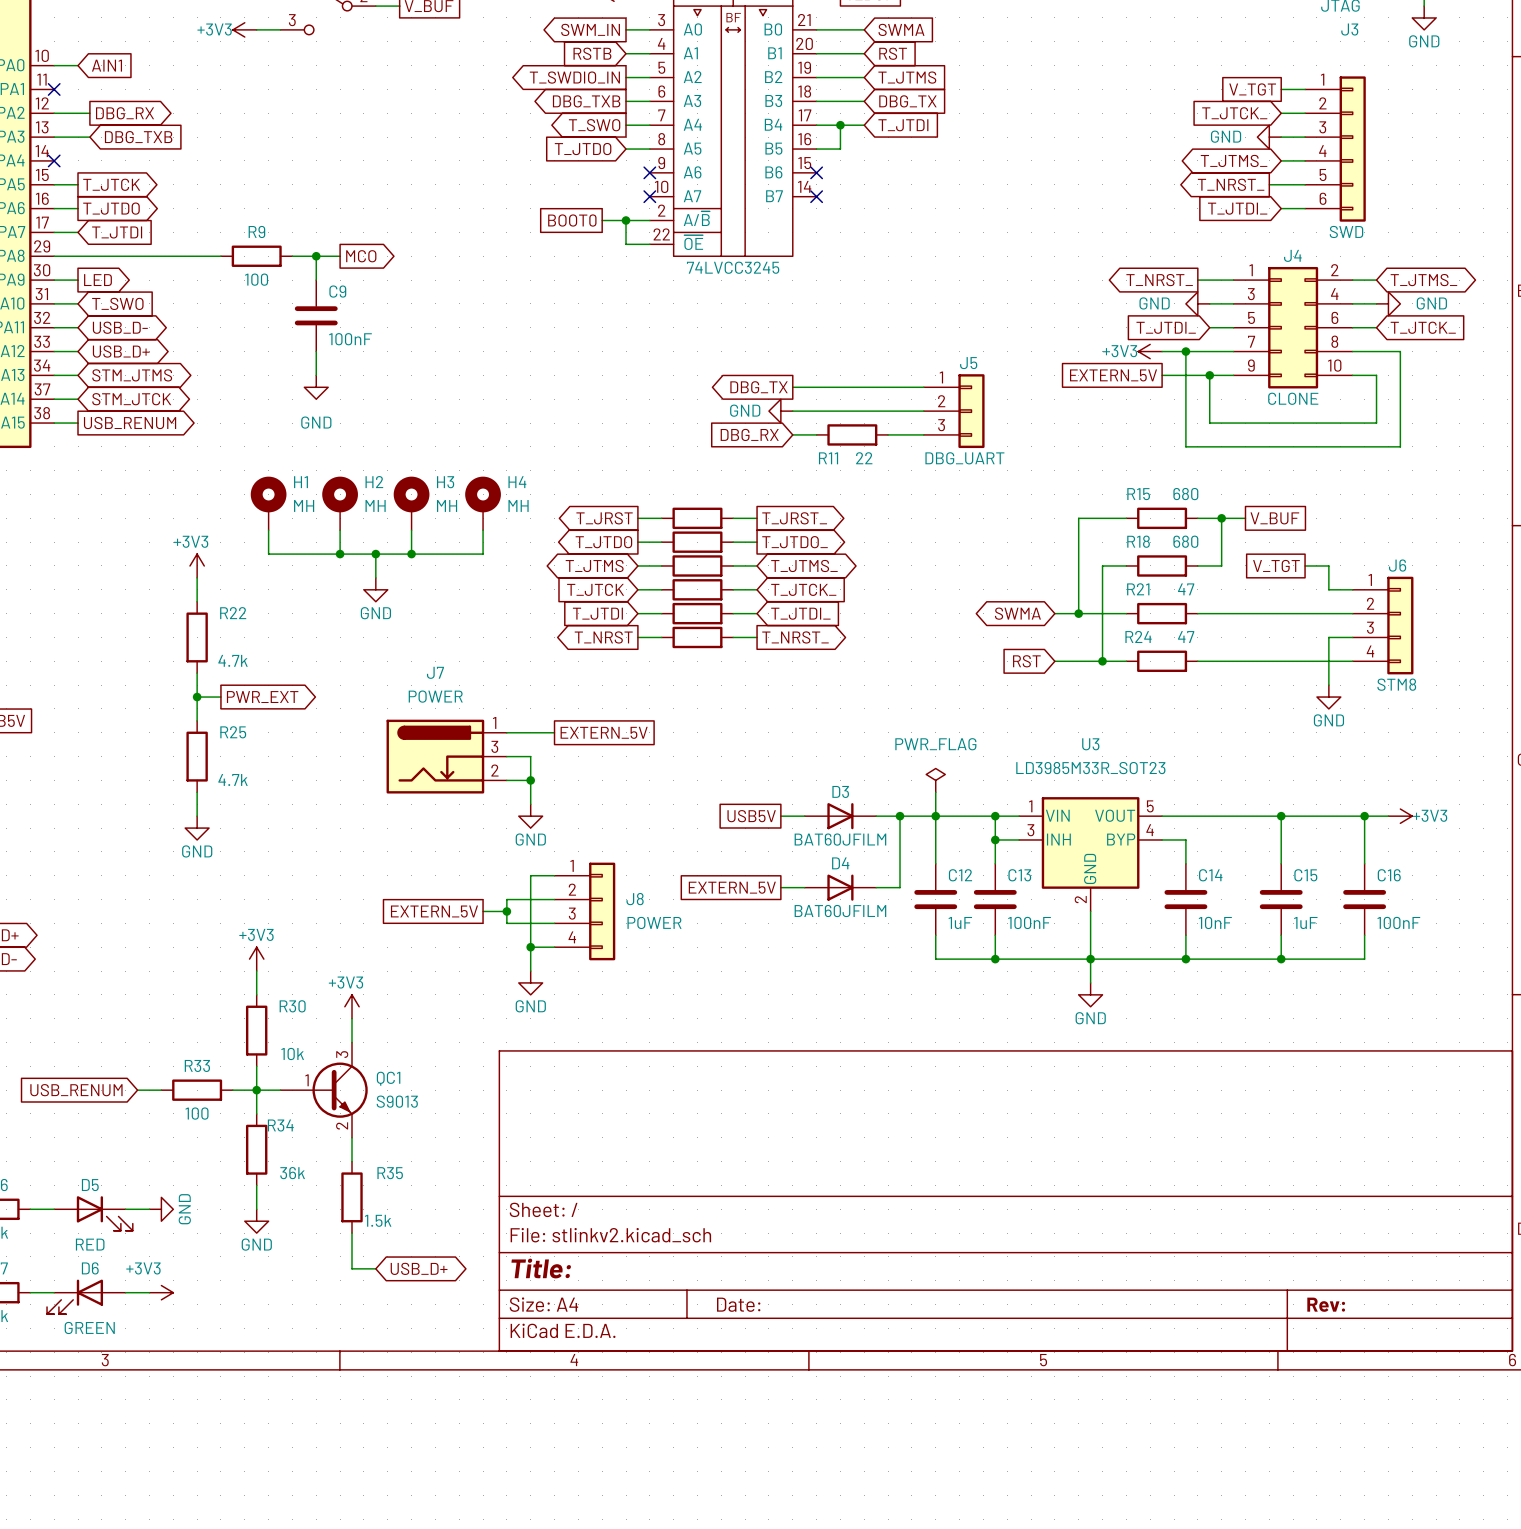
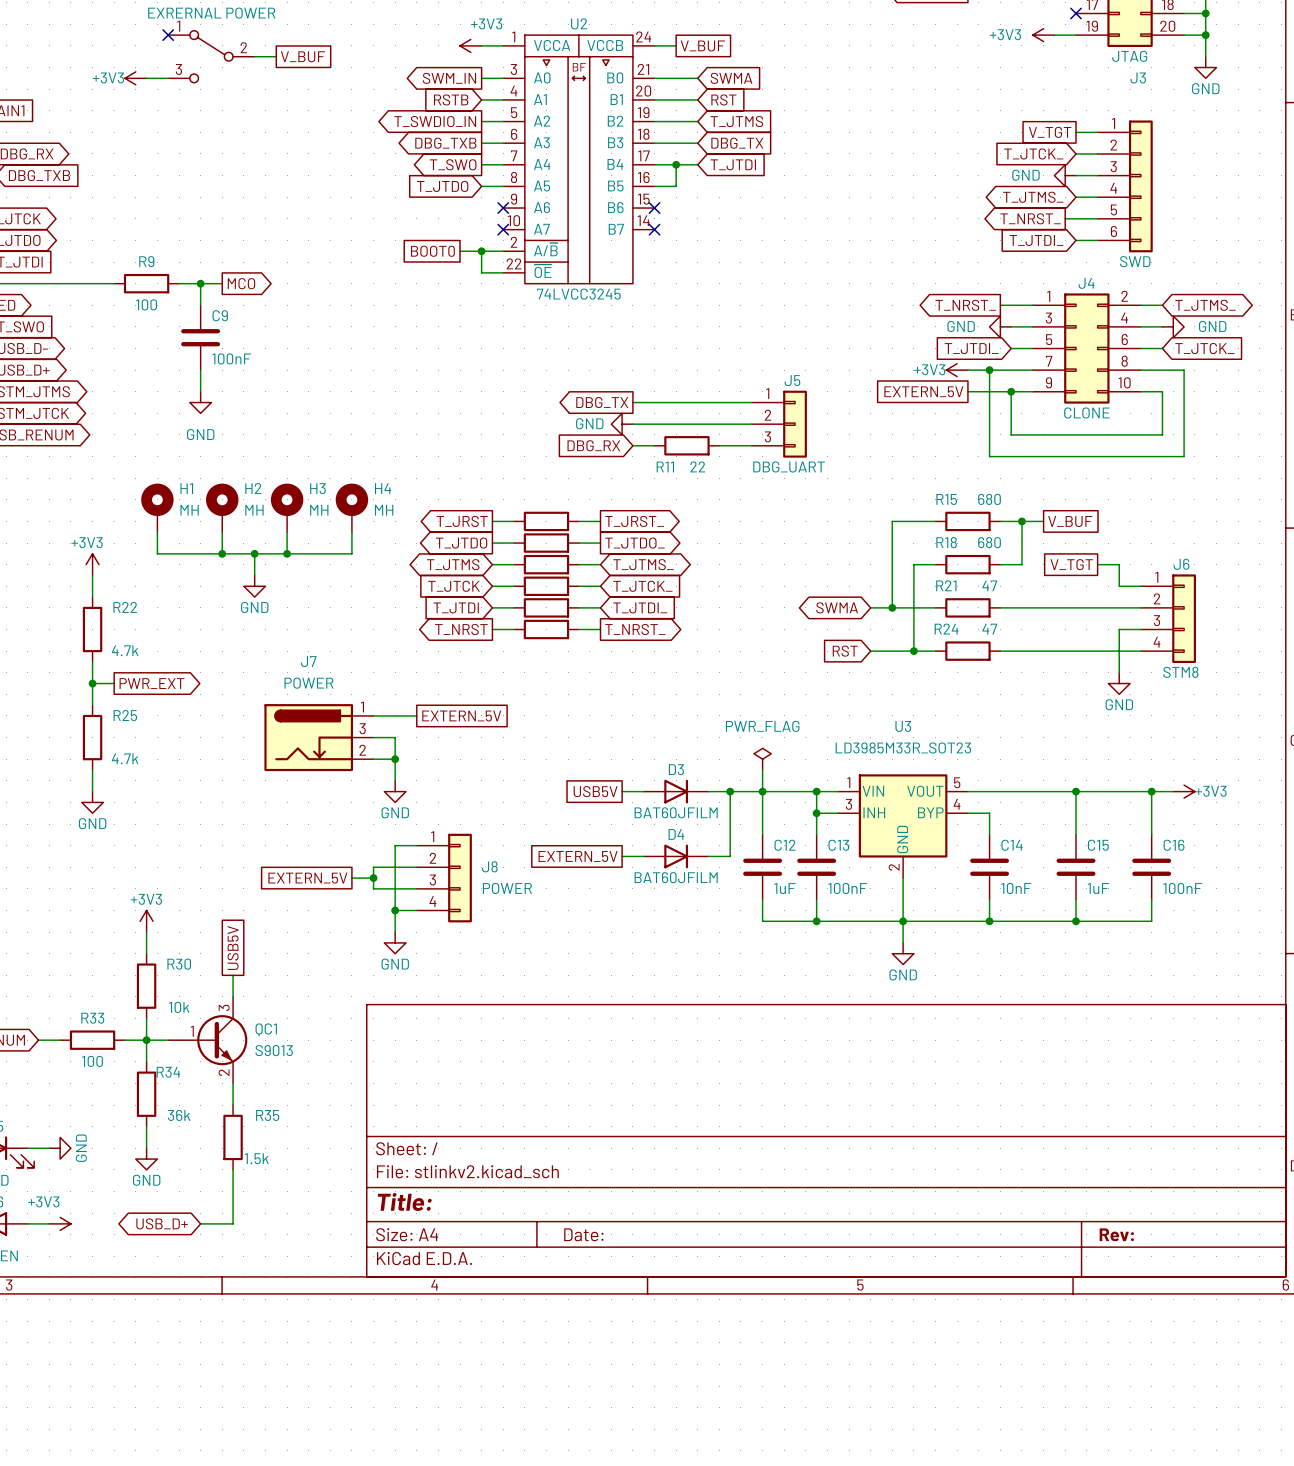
global label: none -> USB5V (233, 948)
power symbol: +3V3 (352, 1006) -> none
wire: (352, 1268) (375, 1268) -> (233, 1202) (233, 1223) (200, 1223)
global label rotation: 0° (419, 1268) -> 180° (162, 1223)
global label position: USB_D+ (419, 1268) -> USB_D+ (162, 1223)

